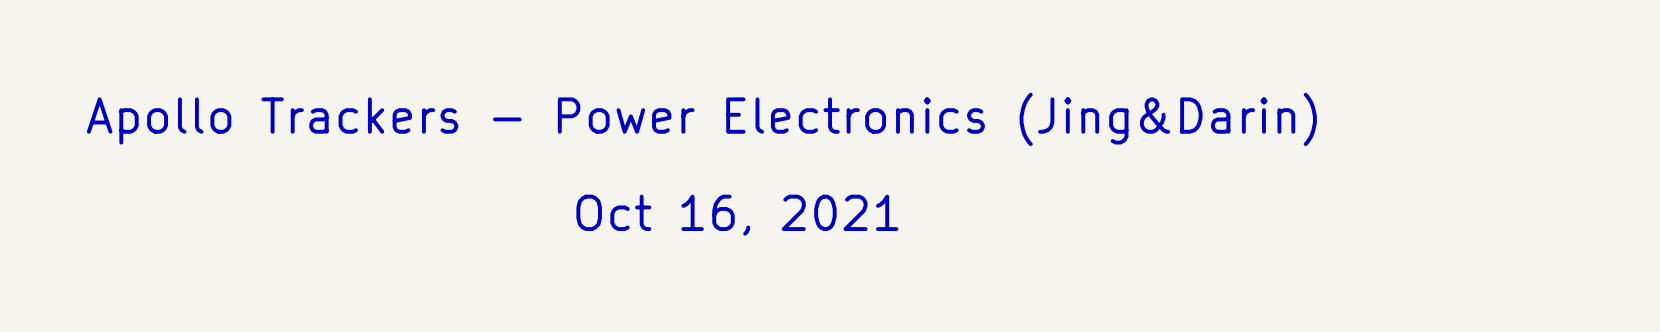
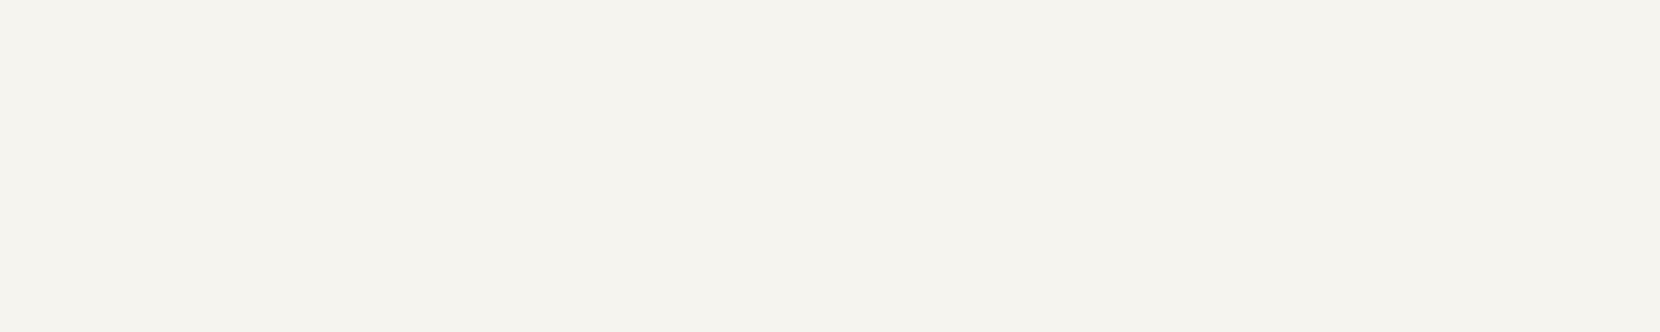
text: Apollo Trackers - Power Electronics (Jing&Darin) (701, 119) -> none
text: Oct 16, 2021 (737, 215) -> none

